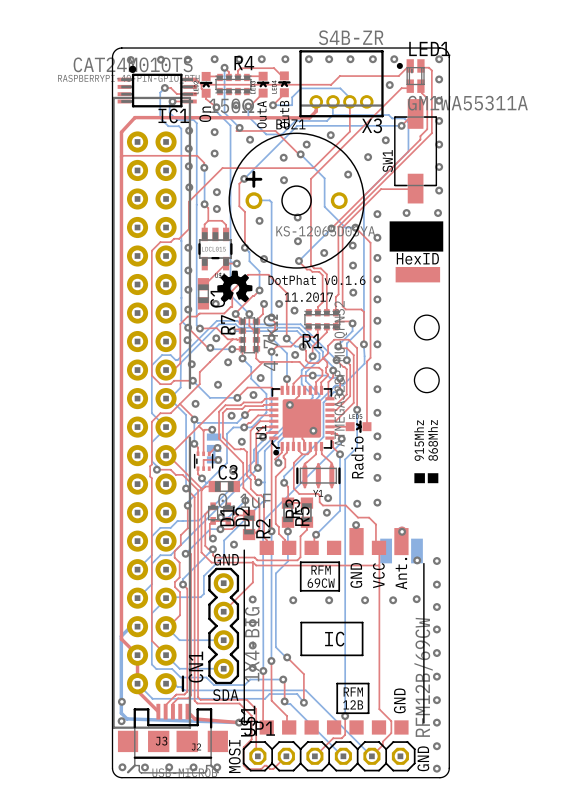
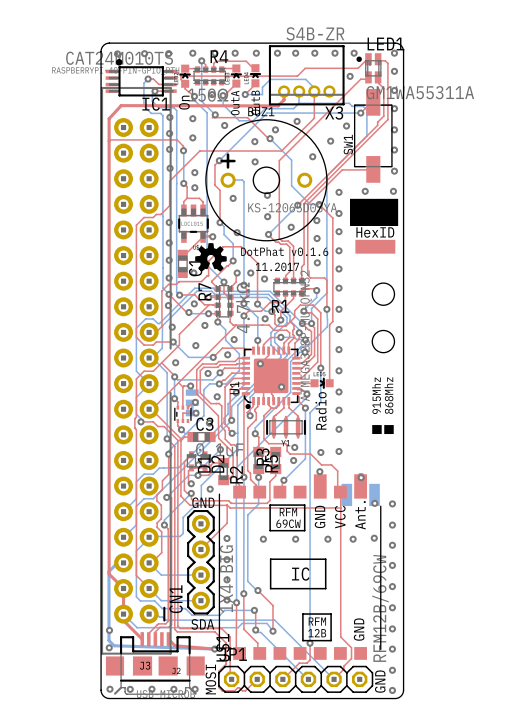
via: (235, 314) -> none

